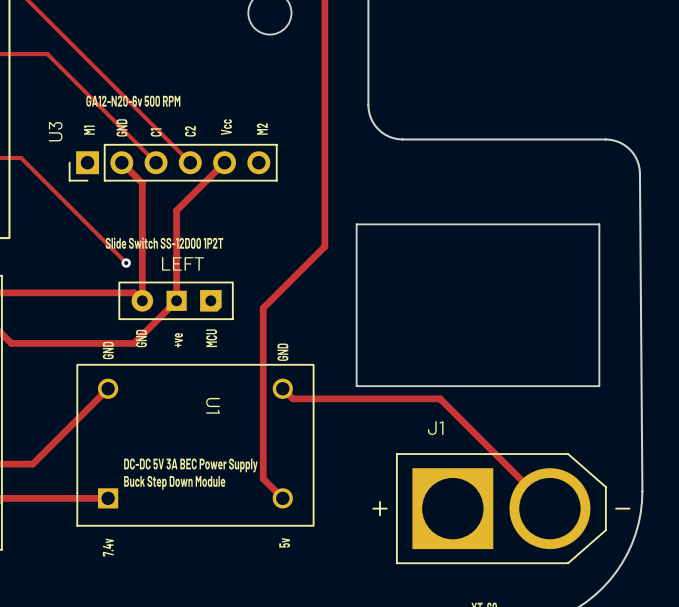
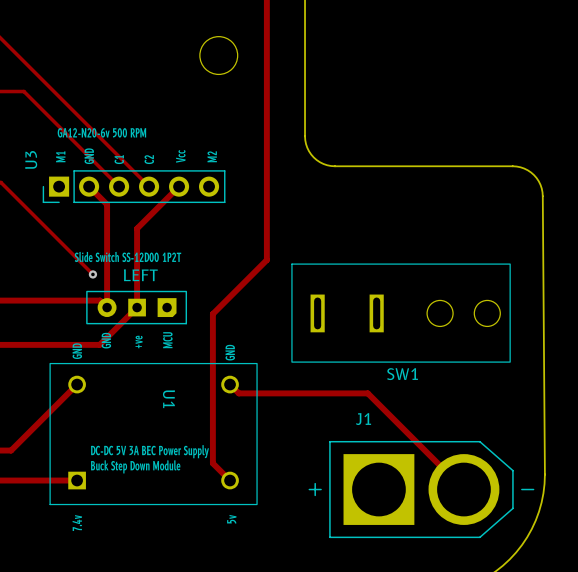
board edge: (356, 224) (599, 224) (599, 386) (356, 386) (356, 224) -> none
SW1: none -> (401, 313)

